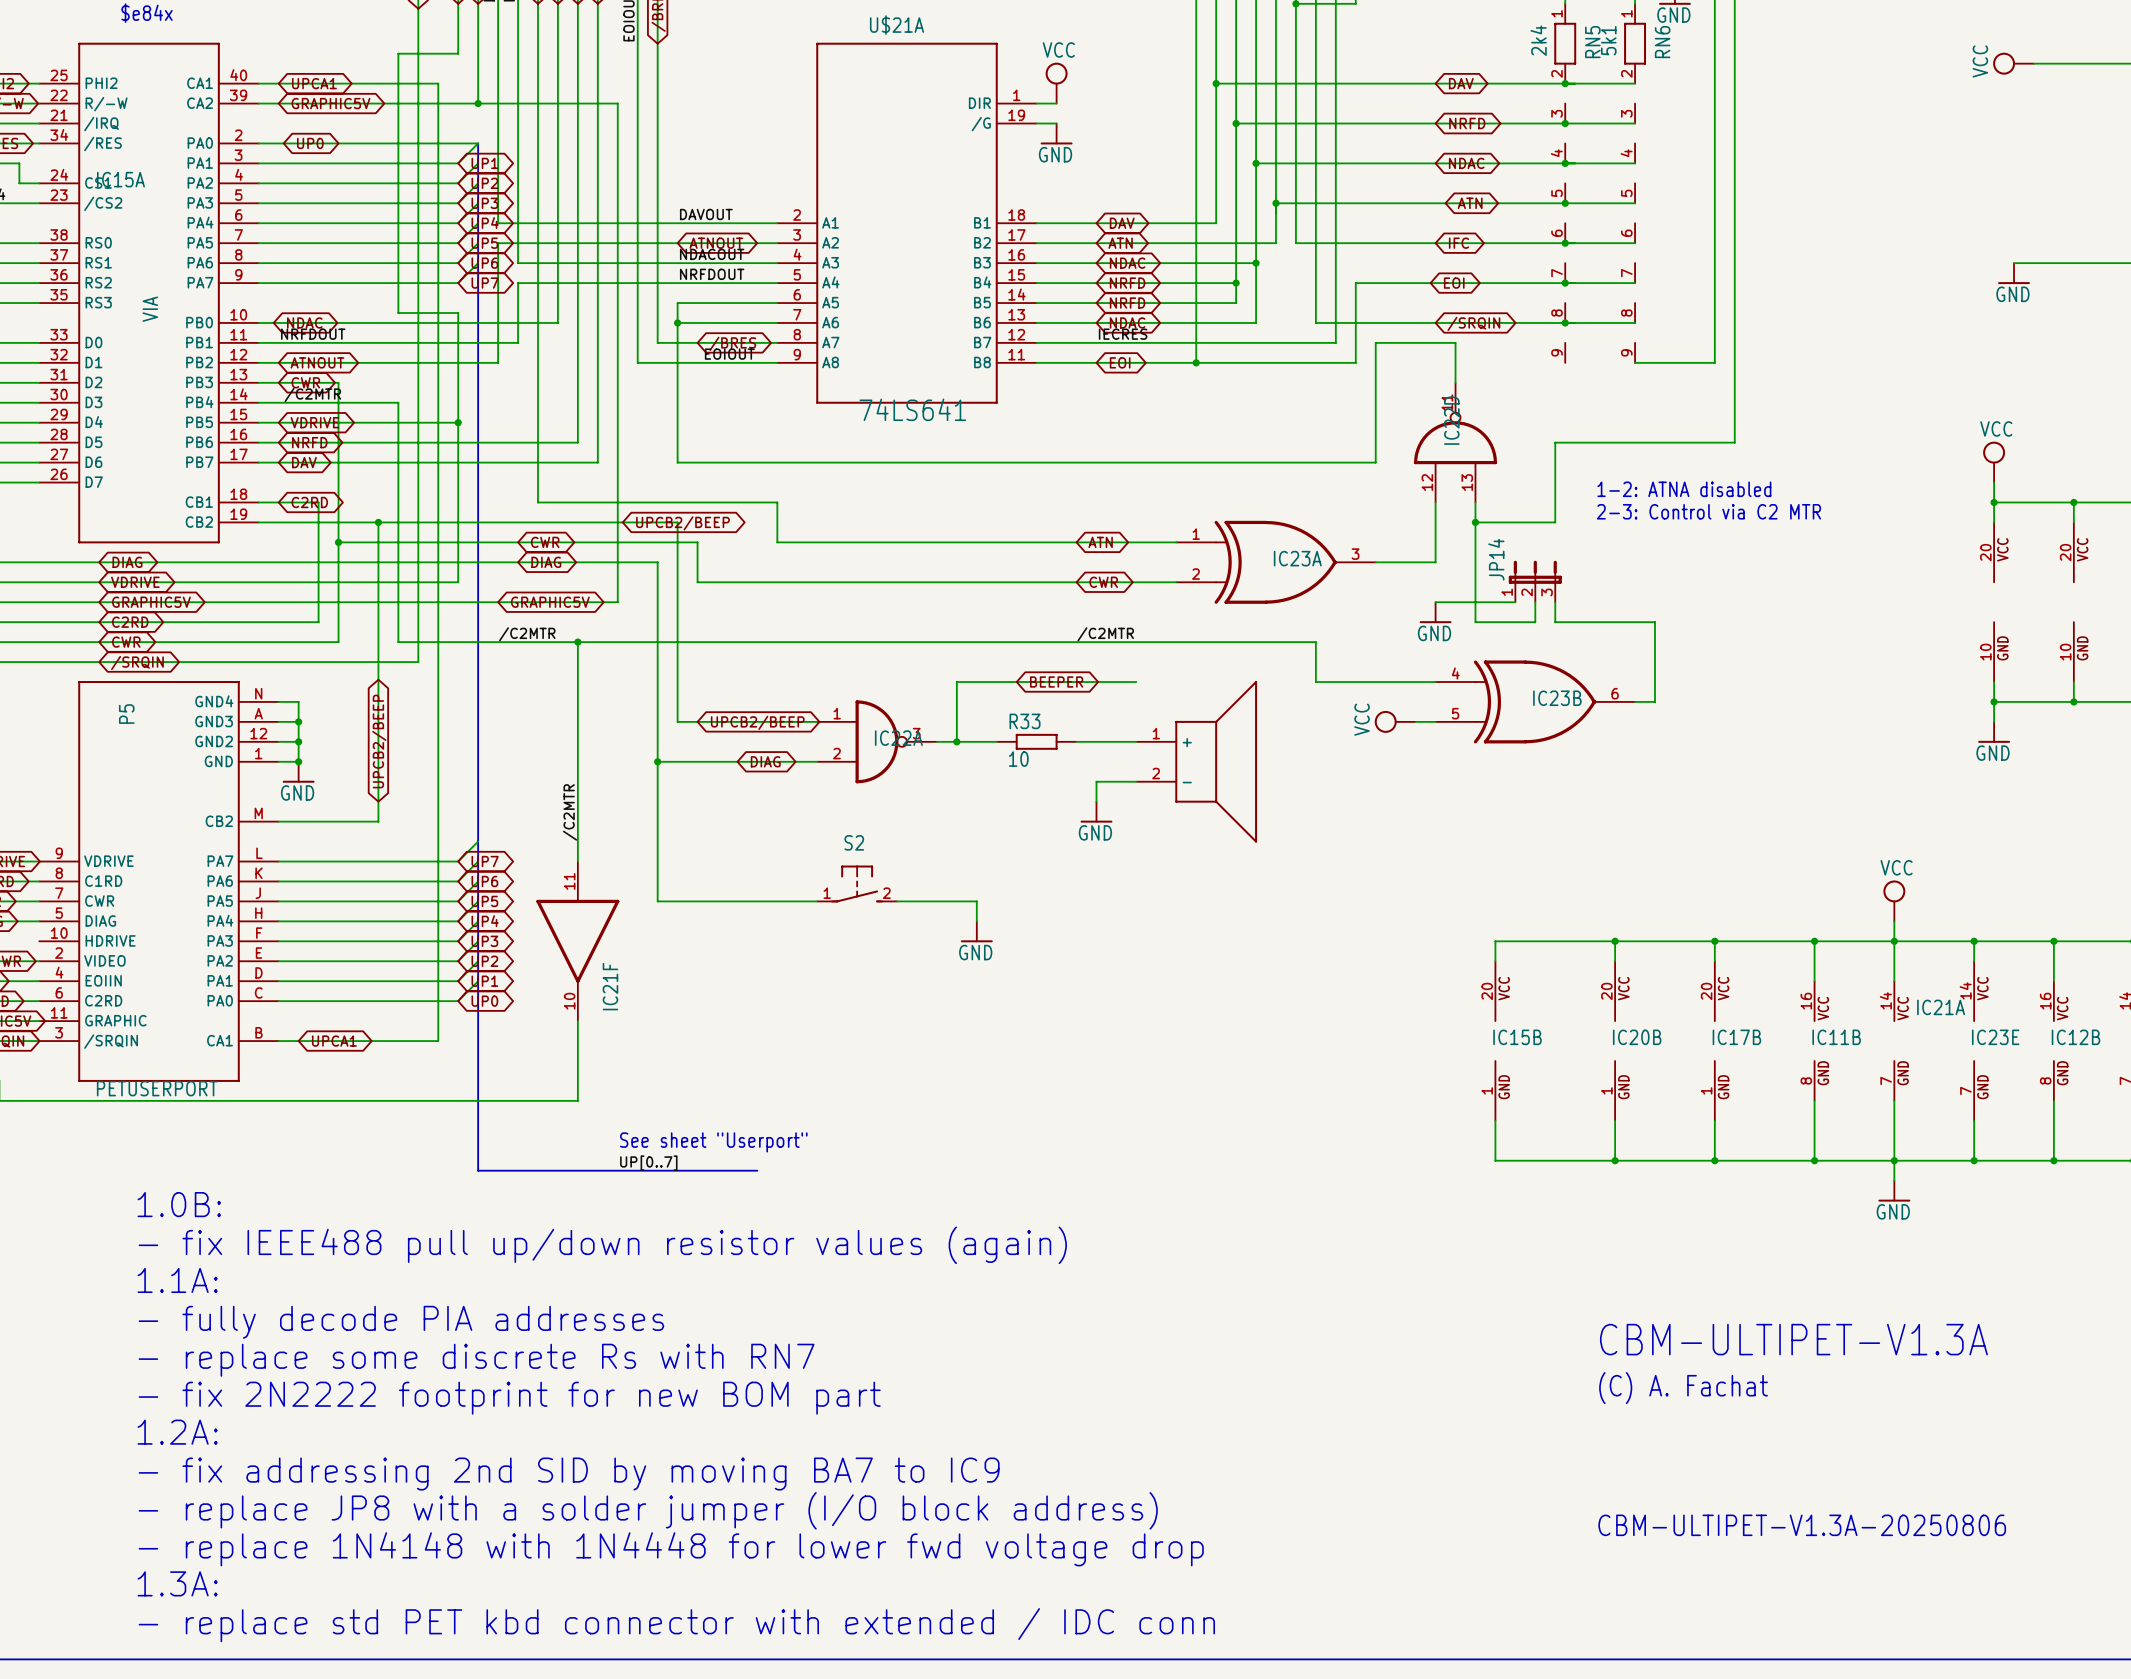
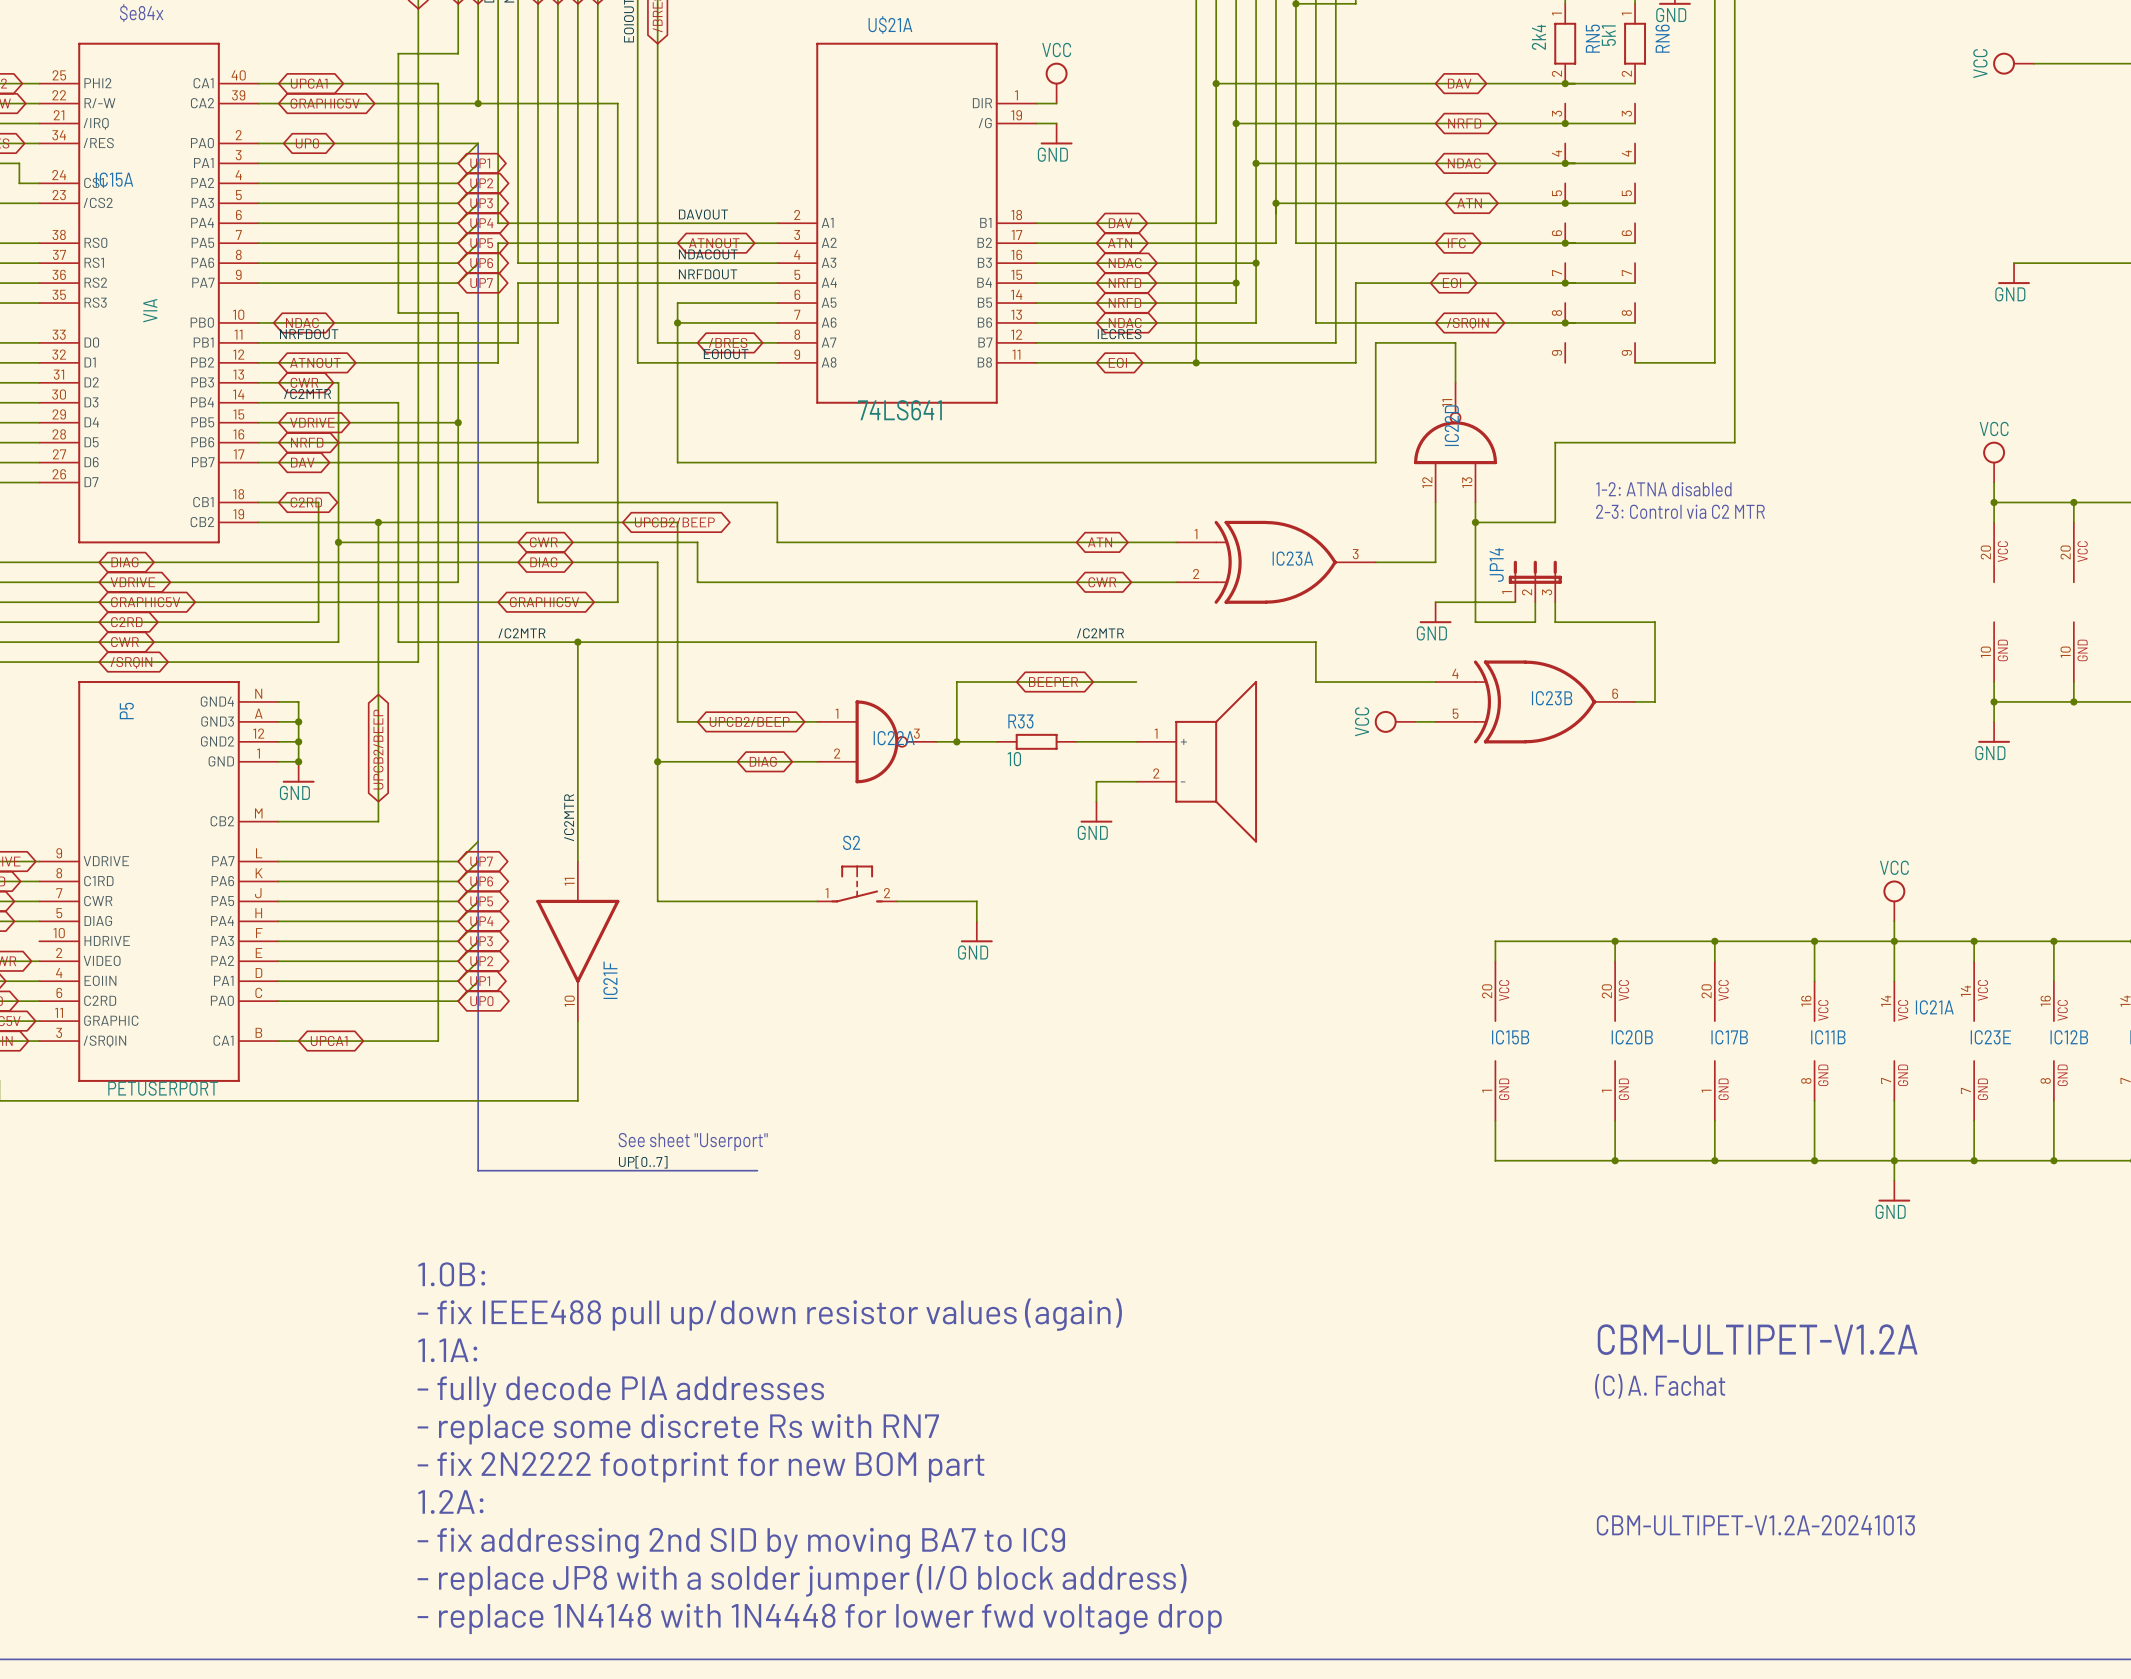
text: 1.0B: (179, 1204) -> none
text: - fix IEEE488 pull up/down resistor values (again) (602, 1245) -> none
text: none -> 1.0B: (451, 1274)
text: 1.1A: (177, 1280) -> none
text: none -> - fix IEEE488 pull up/down resistor values (again) (769, 1314)
text: - fully decode PIA addresses (401, 1322) -> none
text: CBM-ULTIPET-V1.3A (1793, 1339) -> CBM-ULTIPET-V1.2A (1757, 1339)
text: none -> 1.1A: (447, 1350)
text: - replace some discrete Rs with RN7 (476, 1360) -> none
text: none -> - fully decode PIA addresses (620, 1391)
text: - fix 2N2222 footprint for new BOM part (509, 1398) -> none
text: none -> - replace some discrete Rs with RN7 (678, 1429)
text: 1.2A: (177, 1432) -> none
text: none -> - fix 2N2222 footprint for new BOM part (700, 1467)
text: - fix addressing 2nd SID by moving BA7 to IC9 (569, 1474) -> none
text: none -> 1.2A: (450, 1501)
text: - replace JP8 with a solder jumper (I/O block address) (648, 1510) -> none
text: CBM-ULTIPET-V1.3A-20250806 (1802, 1525) -> CBM-ULTIPET-V1.2A-20241013 (1755, 1525)
text: none -> - fix addressing 2nd SID by moving BA7 to IC9 (741, 1543)
text: - replace 1N4148 with 1N4448 for lower fwd voltage drop (671, 1549) -> none
text: none -> - replace JP8 with a solder jumper (I/O block address) (802, 1580)
text: 1.3A: (177, 1583) -> none
text: none -> - replace 1N4148 with 1N4448 for lower fwd voltage drop (819, 1618)
text: - replace std PET kbd connector with extended / IDC conn (676, 1625) -> none

